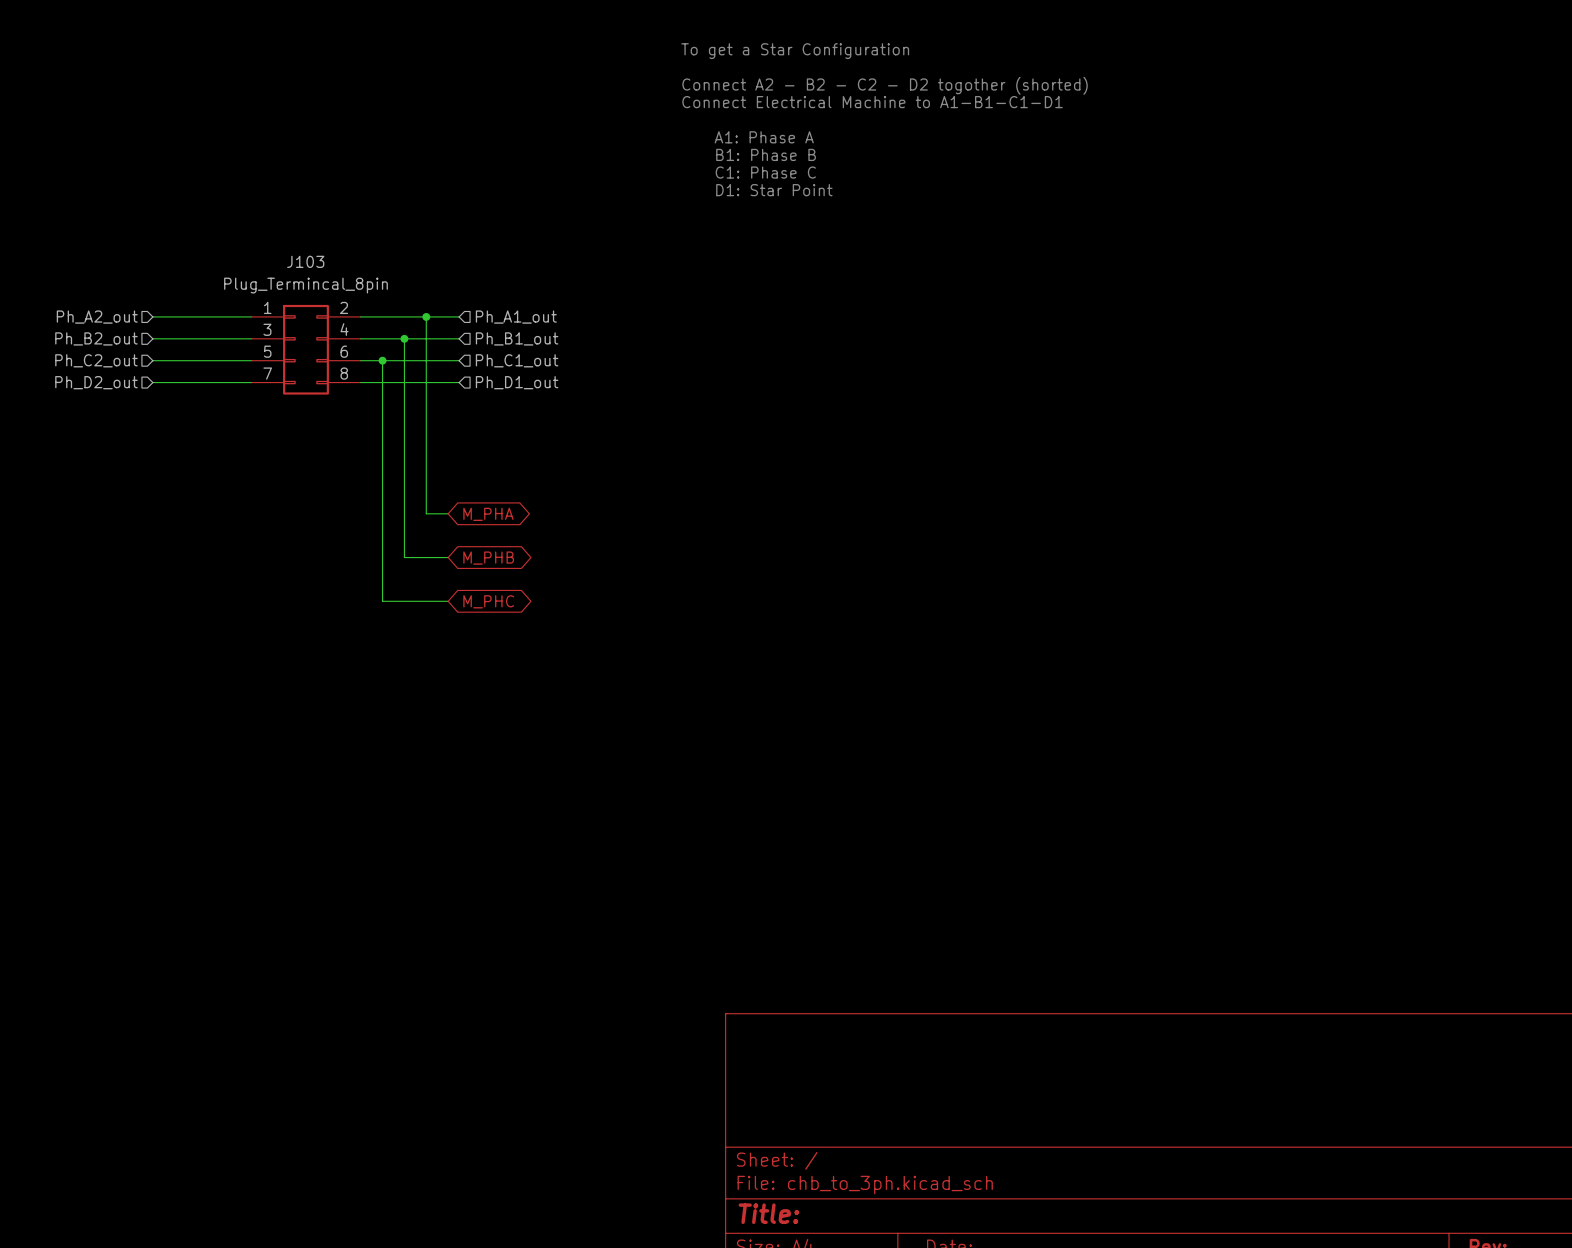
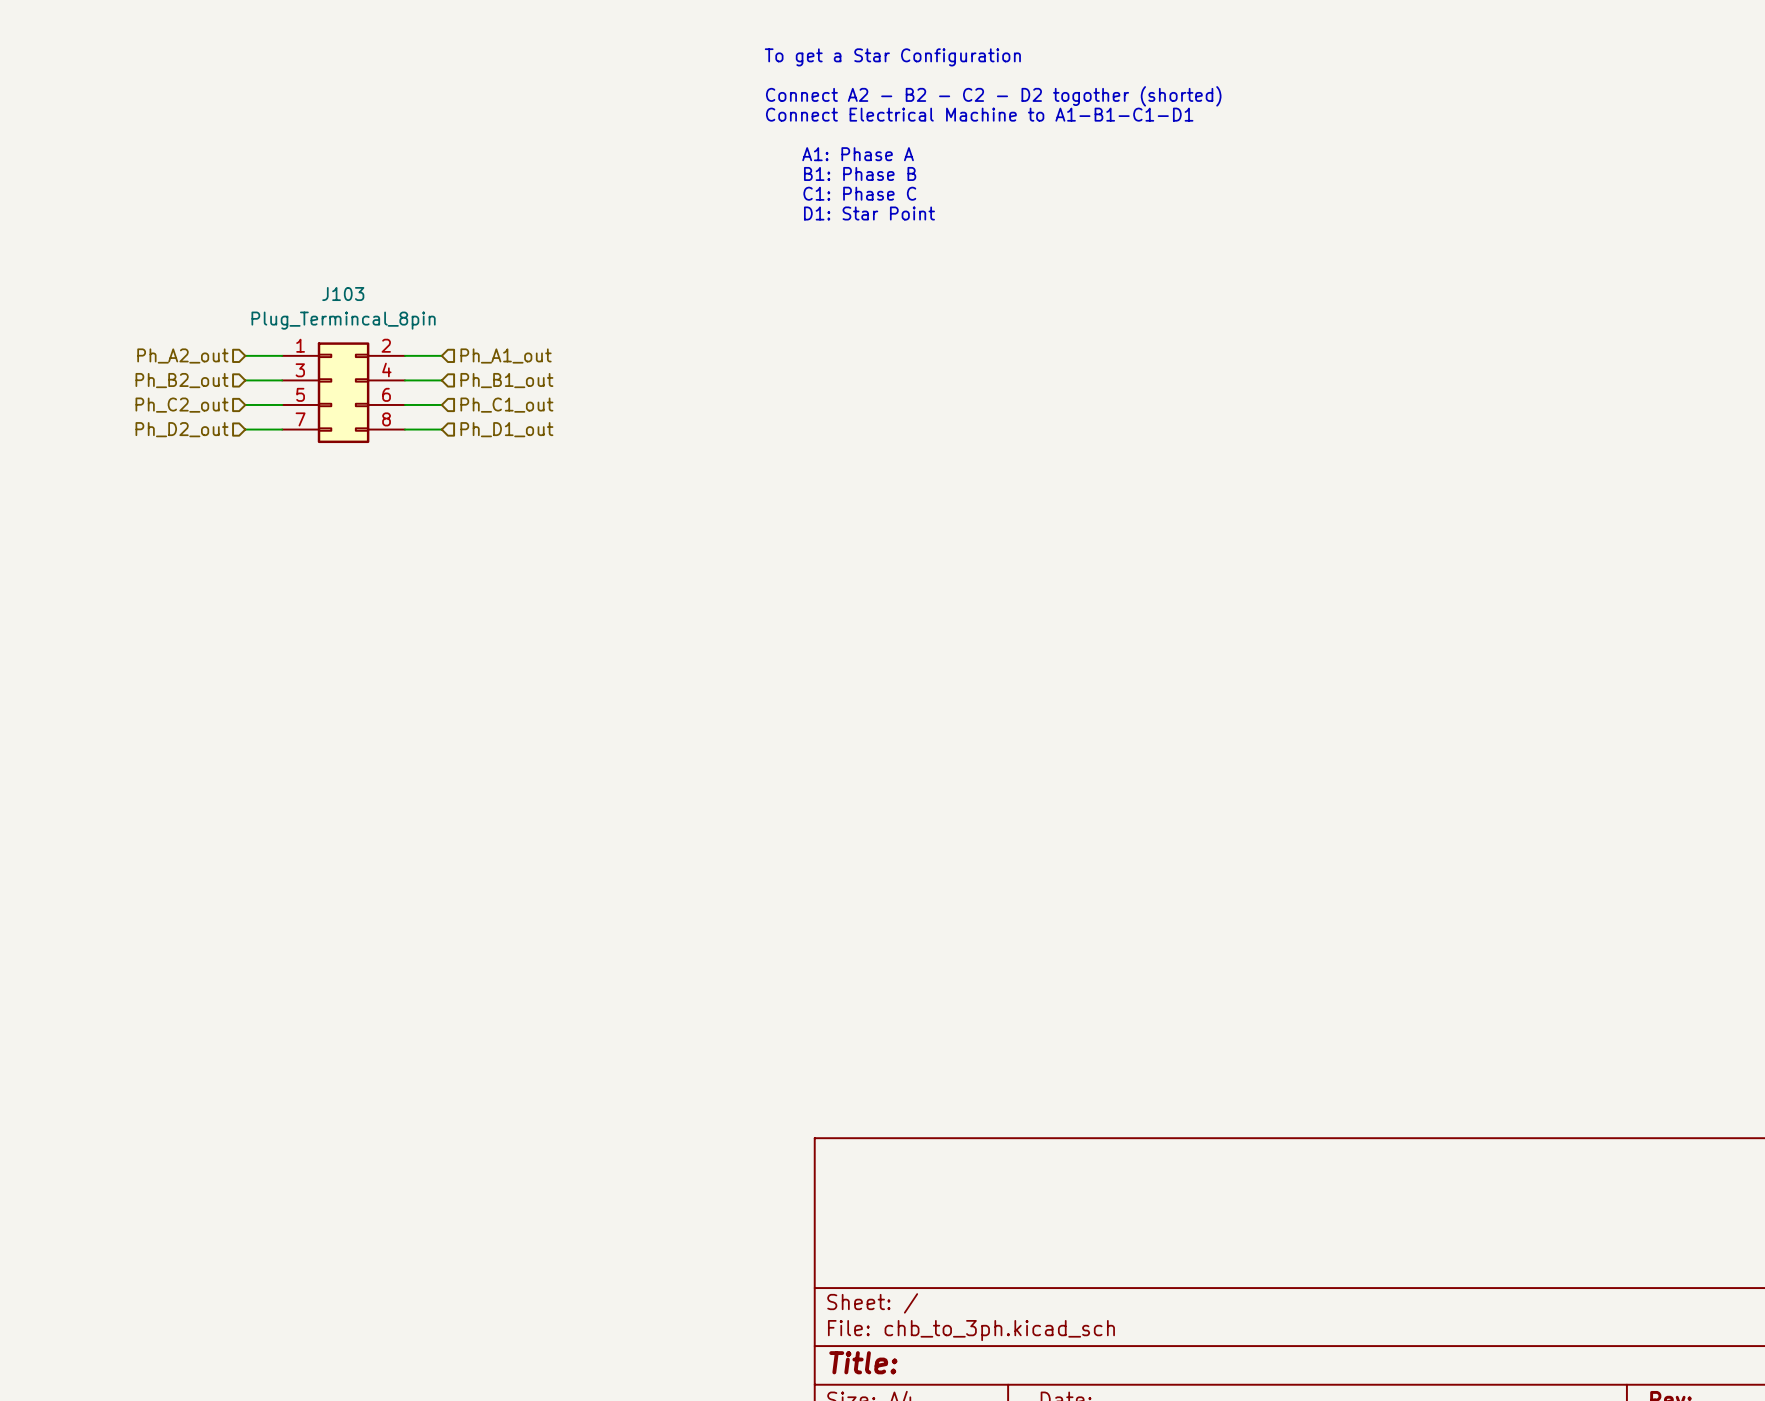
wire: (152, 316) (218, 316) -> none
wire: (393, 316) (459, 316) -> none
wire: (426, 316) (426, 513) (448, 513) -> none
junction: (426, 316) -> none
hierarchical label position: Ph_A2_out (97, 317) -> Ph_A2_out (182, 355)
hierarchical label position: Ph_A1_out (516, 317) -> Ph_A1_out (506, 355)
hierarchical label position: Ph_B2_out (96, 338) -> Ph_B2_out (181, 380)
wire: (152, 338) (218, 338) -> none
wire: (393, 338) (459, 338) -> none
wire: (404, 338) (404, 557) (448, 557) -> none
junction: (404, 338) -> none
hierarchical label position: Ph_B1_out (517, 338) -> Ph_B1_out (506, 380)
hierarchical label position: Ph_C2_out (96, 360) -> Ph_C2_out (181, 405)
wire: (152, 360) (218, 360) -> none
wire: (382, 360) (382, 601) (448, 601) -> none
junction: (382, 360) -> none
wire: (393, 360) (459, 360) -> none
hierarchical label position: Ph_C1_out (517, 360) -> Ph_C1_out (506, 405)
hierarchical label position: Ph_D2_out (96, 382) -> Ph_D2_out (181, 429)
wire: (152, 382) (218, 382) -> none
wire: (393, 382) (459, 382) -> none
hierarchical label position: Ph_D1_out (517, 382) -> Ph_D1_out (506, 429)
global label: M_PHA (488, 514) -> none
global label: M_PHB (488, 558) -> none
global label: M_PHC (488, 601) -> none

